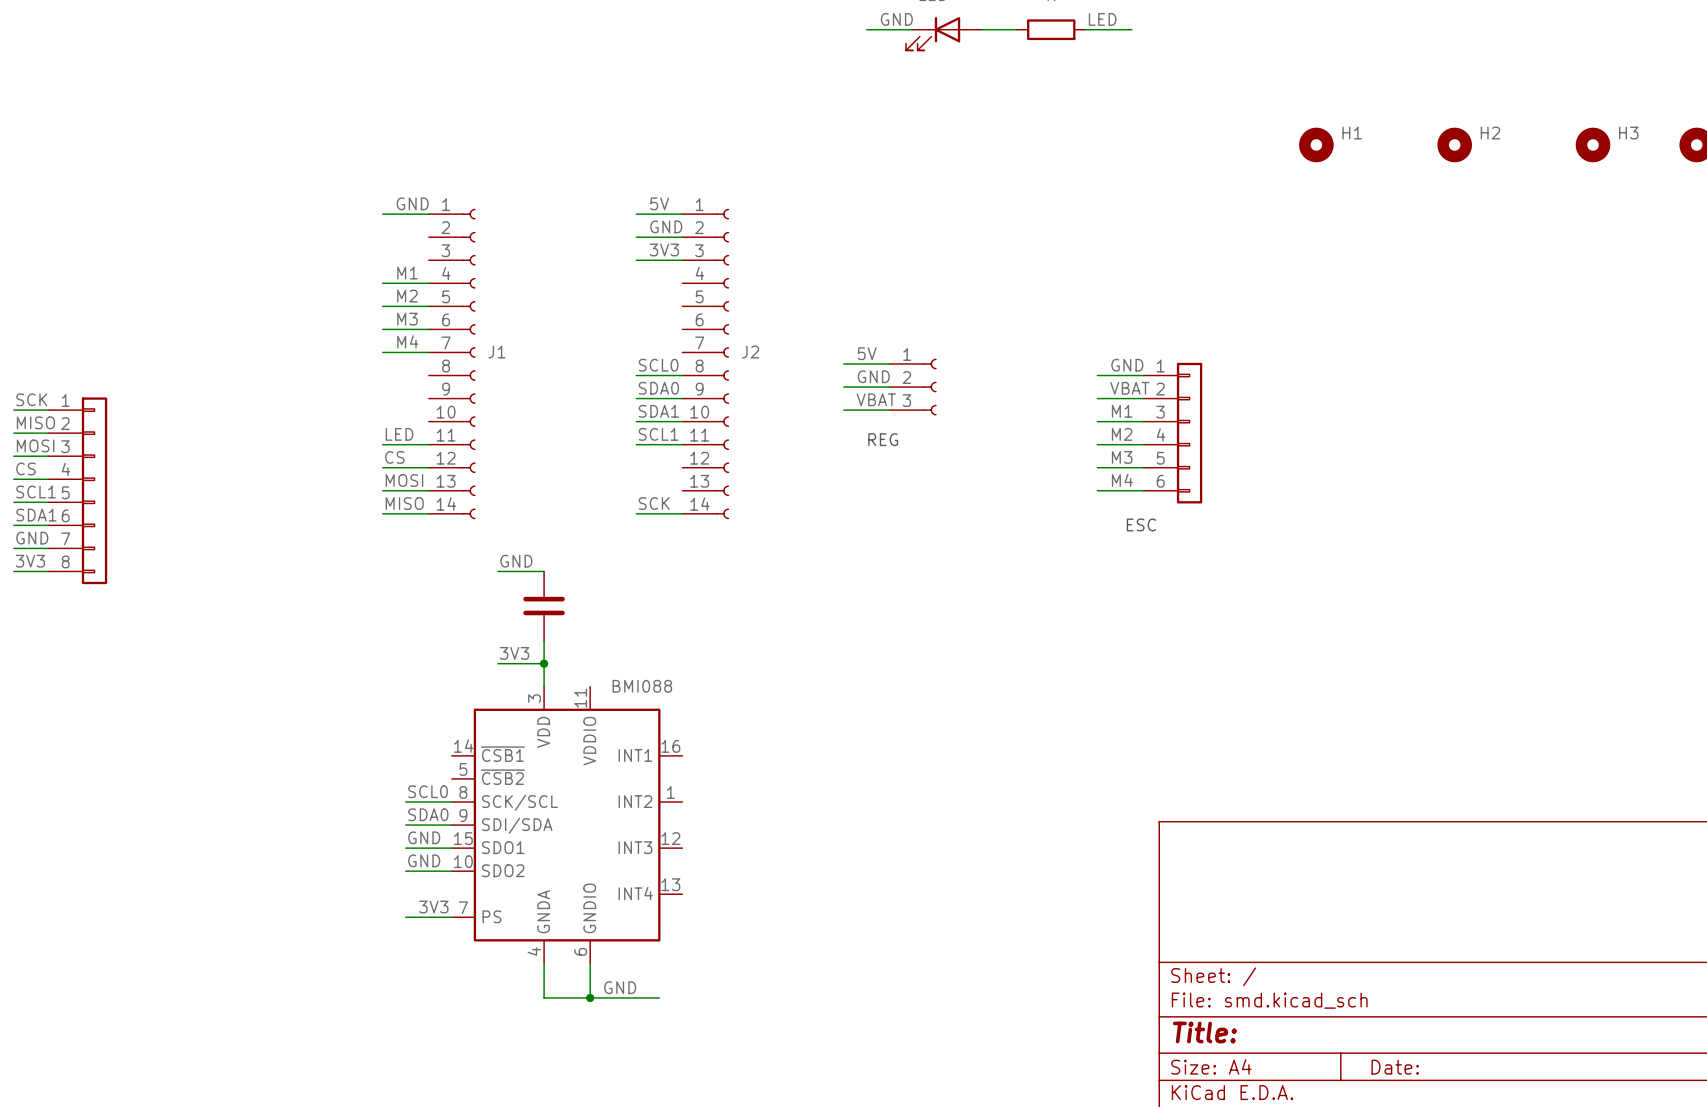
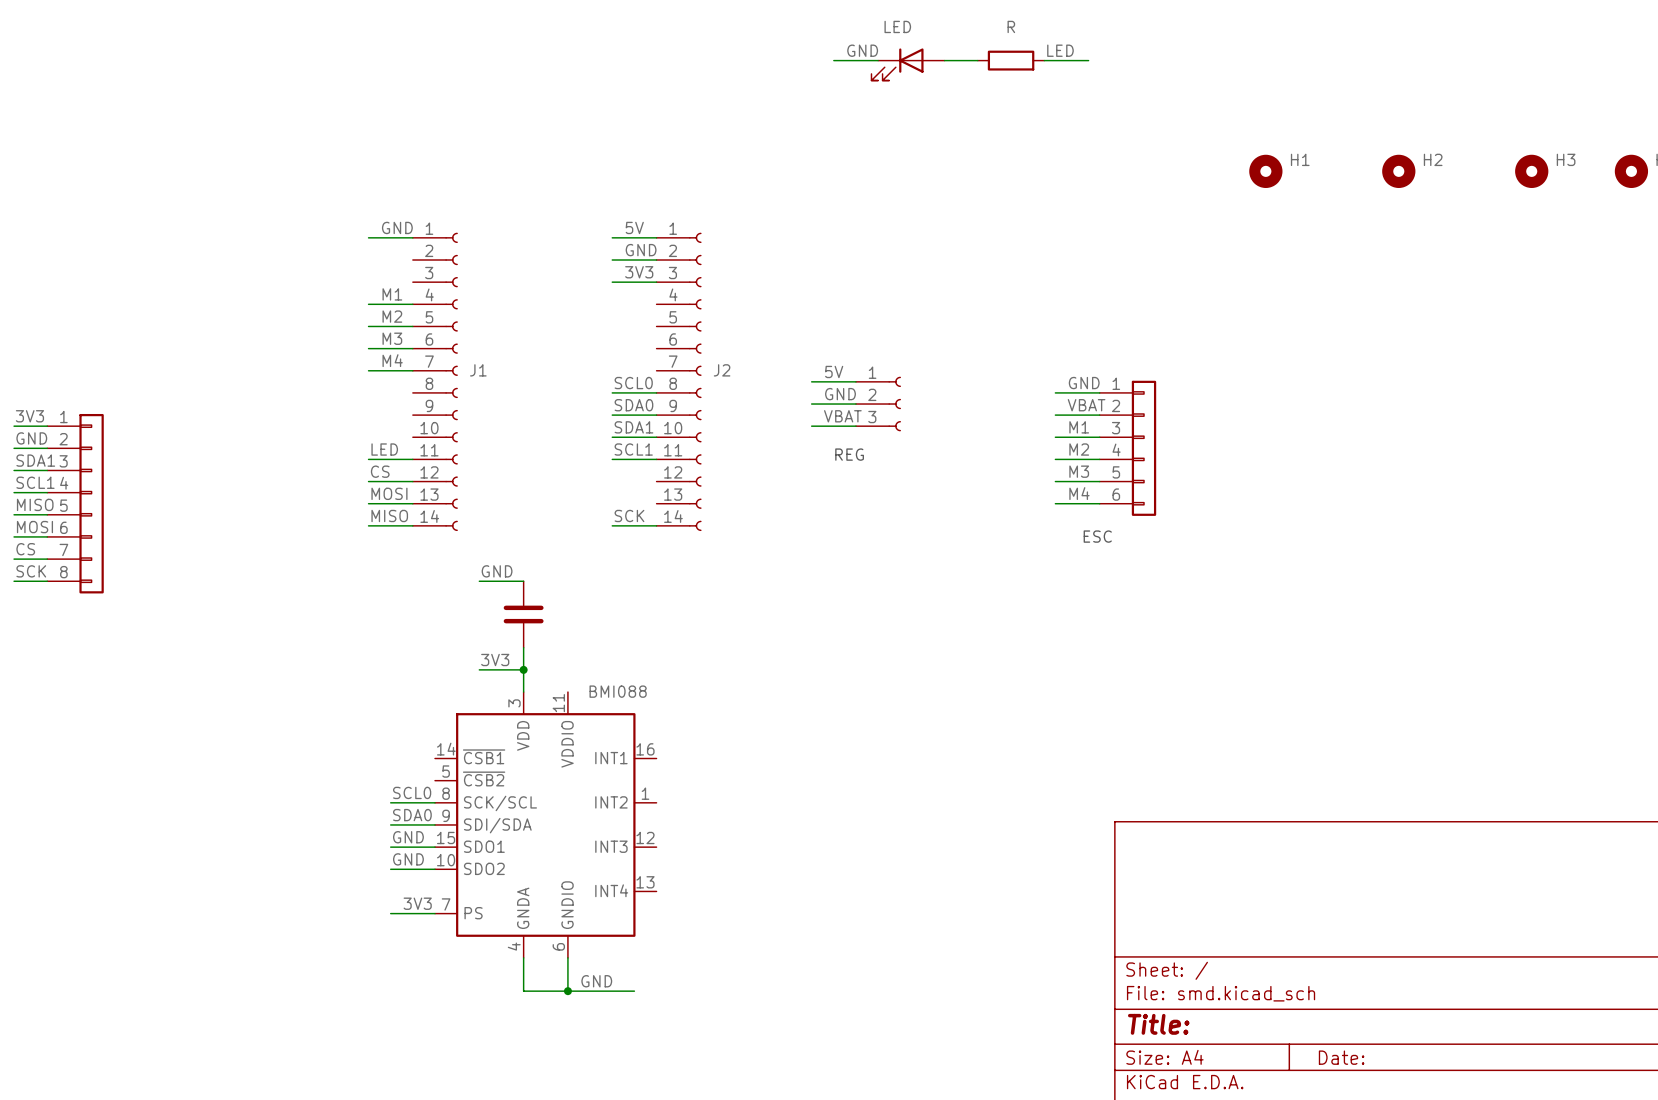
label: SCK (31, 399) -> 3V3 (29, 416)
label: MISO (35, 422) -> GND (31, 438)
label: MOSI (35, 445) -> SDA1 (35, 460)
label: CS (26, 468) -> SCL1 (35, 482)
label: SCL1 (36, 492) -> MISO (35, 504)
label: SDA1 (36, 515) -> MOSI (34, 527)
label: GND (32, 538) -> CS (25, 549)
label: 3V3 (30, 561) -> SCK (31, 571)

